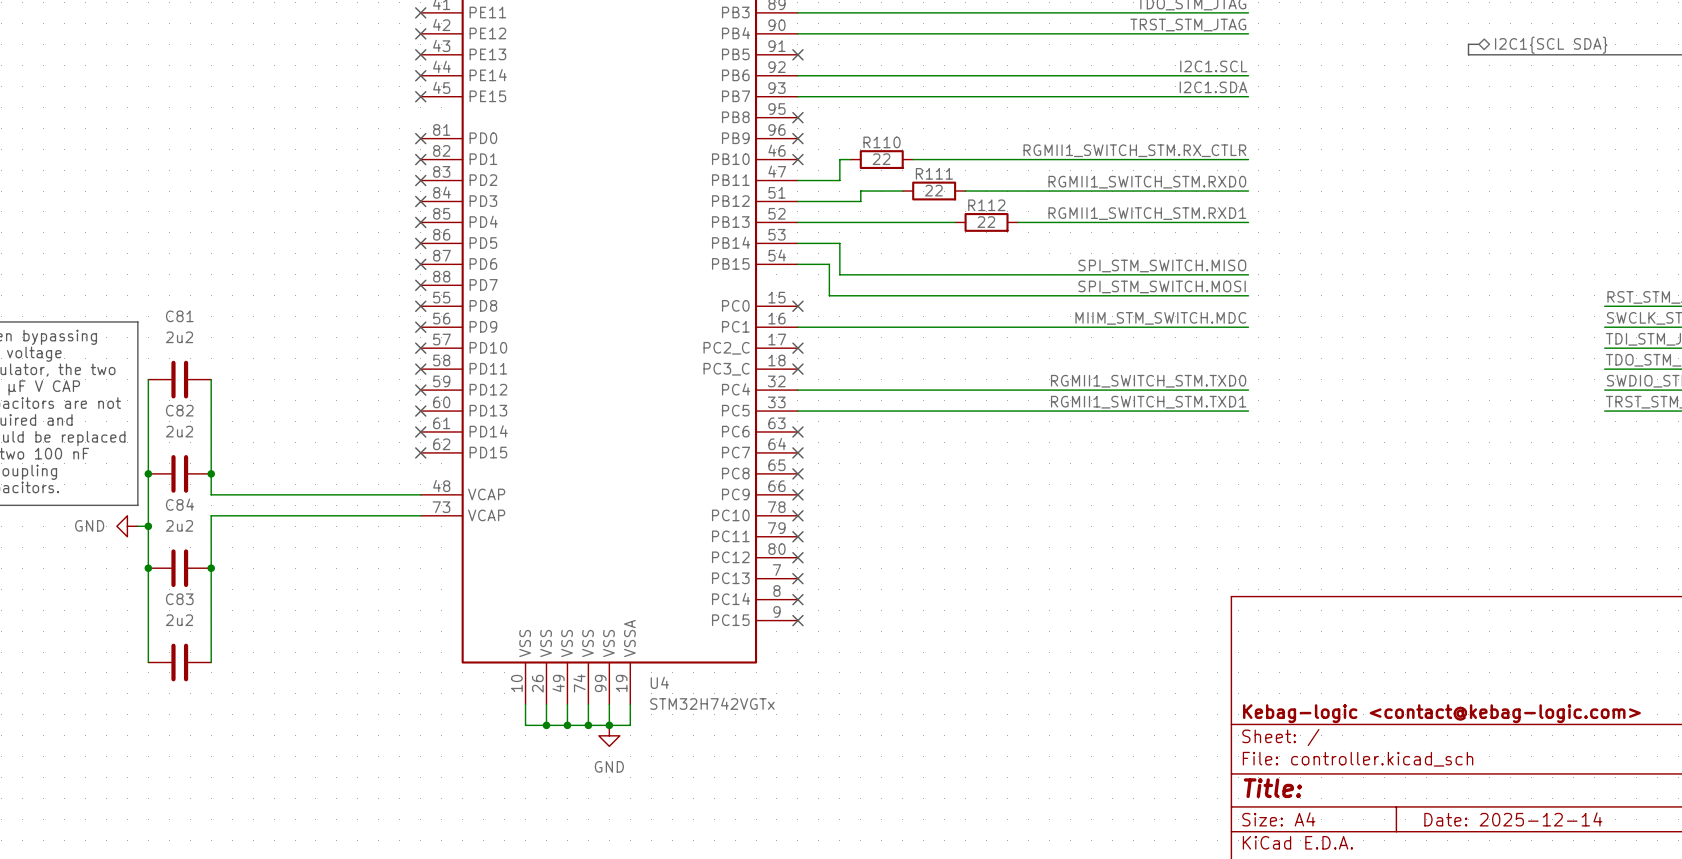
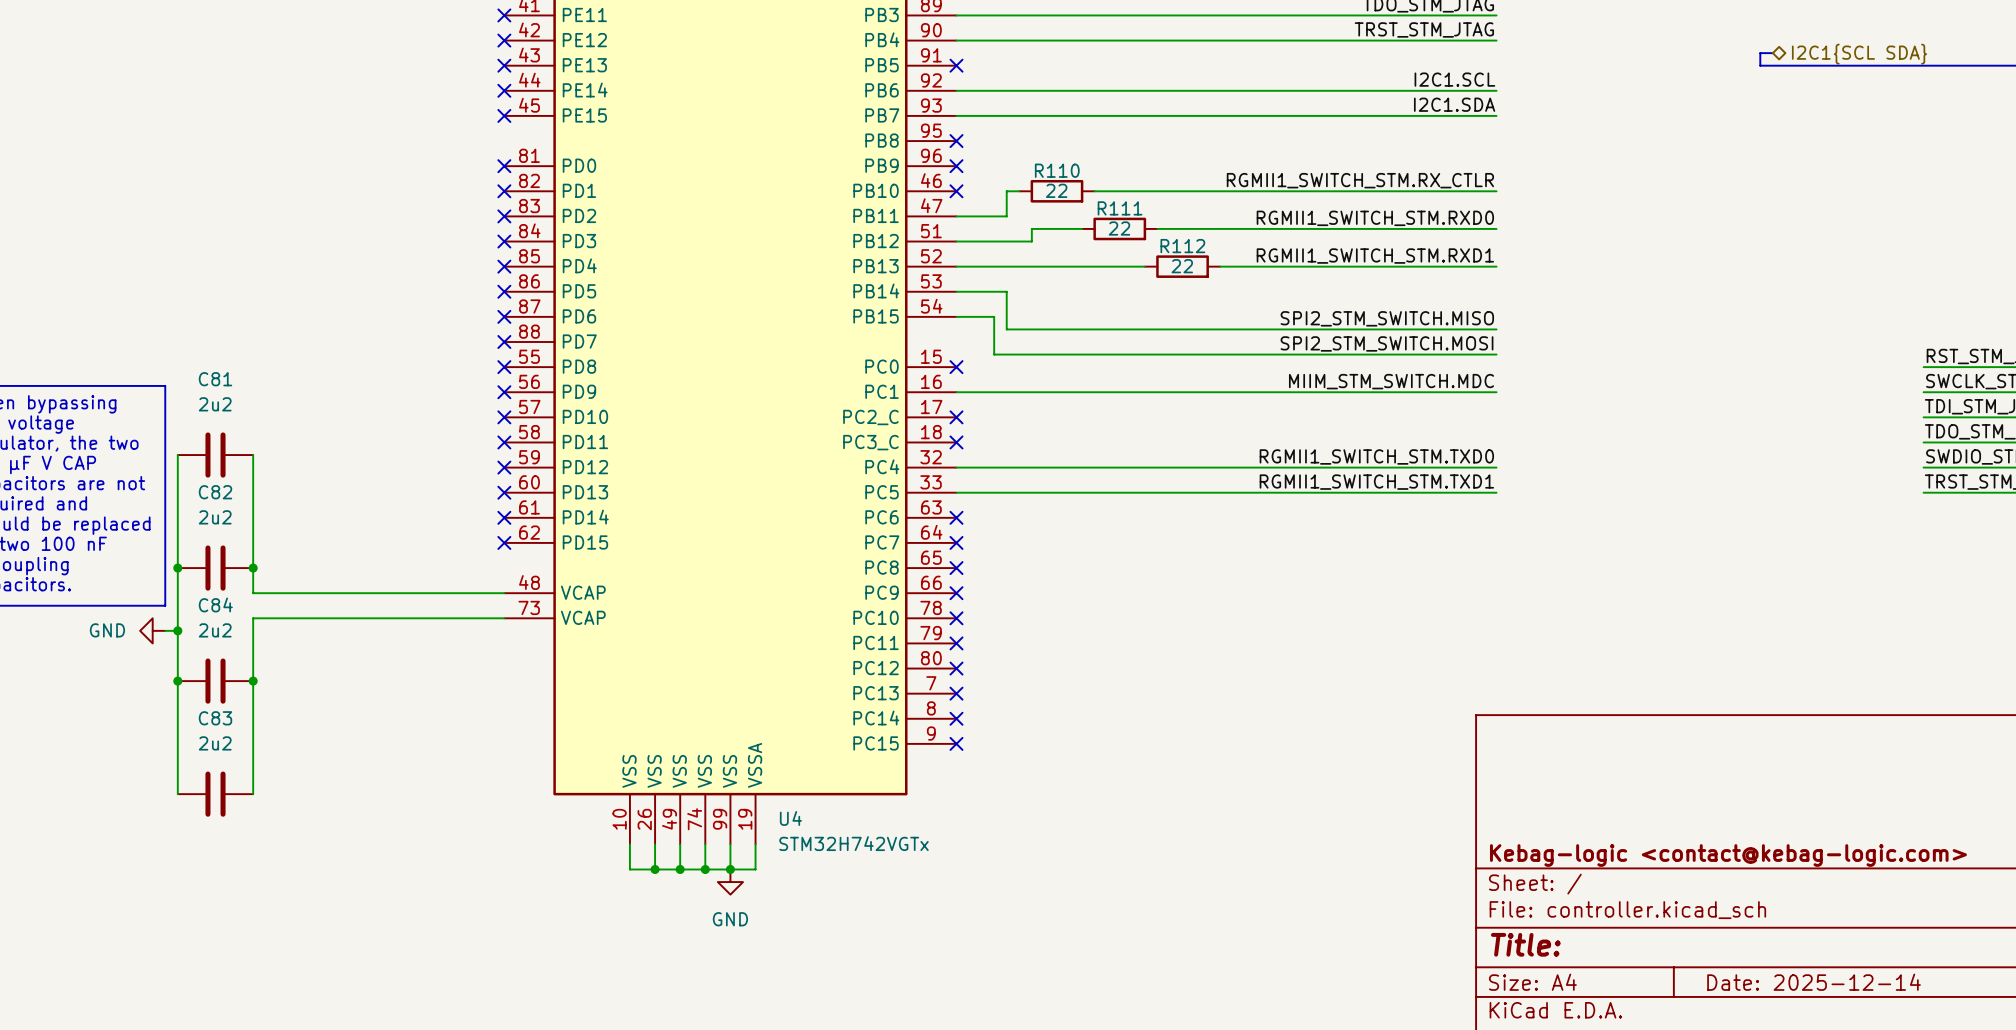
label: SPI_STM_SWITCH.MISO (1162, 265) -> SPI2_STM_SWITCH.MISO (1387, 318)
label: SPI_STM_SWITCH.MOSI (1162, 286) -> SPI2_STM_SWITCH.MOSI (1387, 343)

